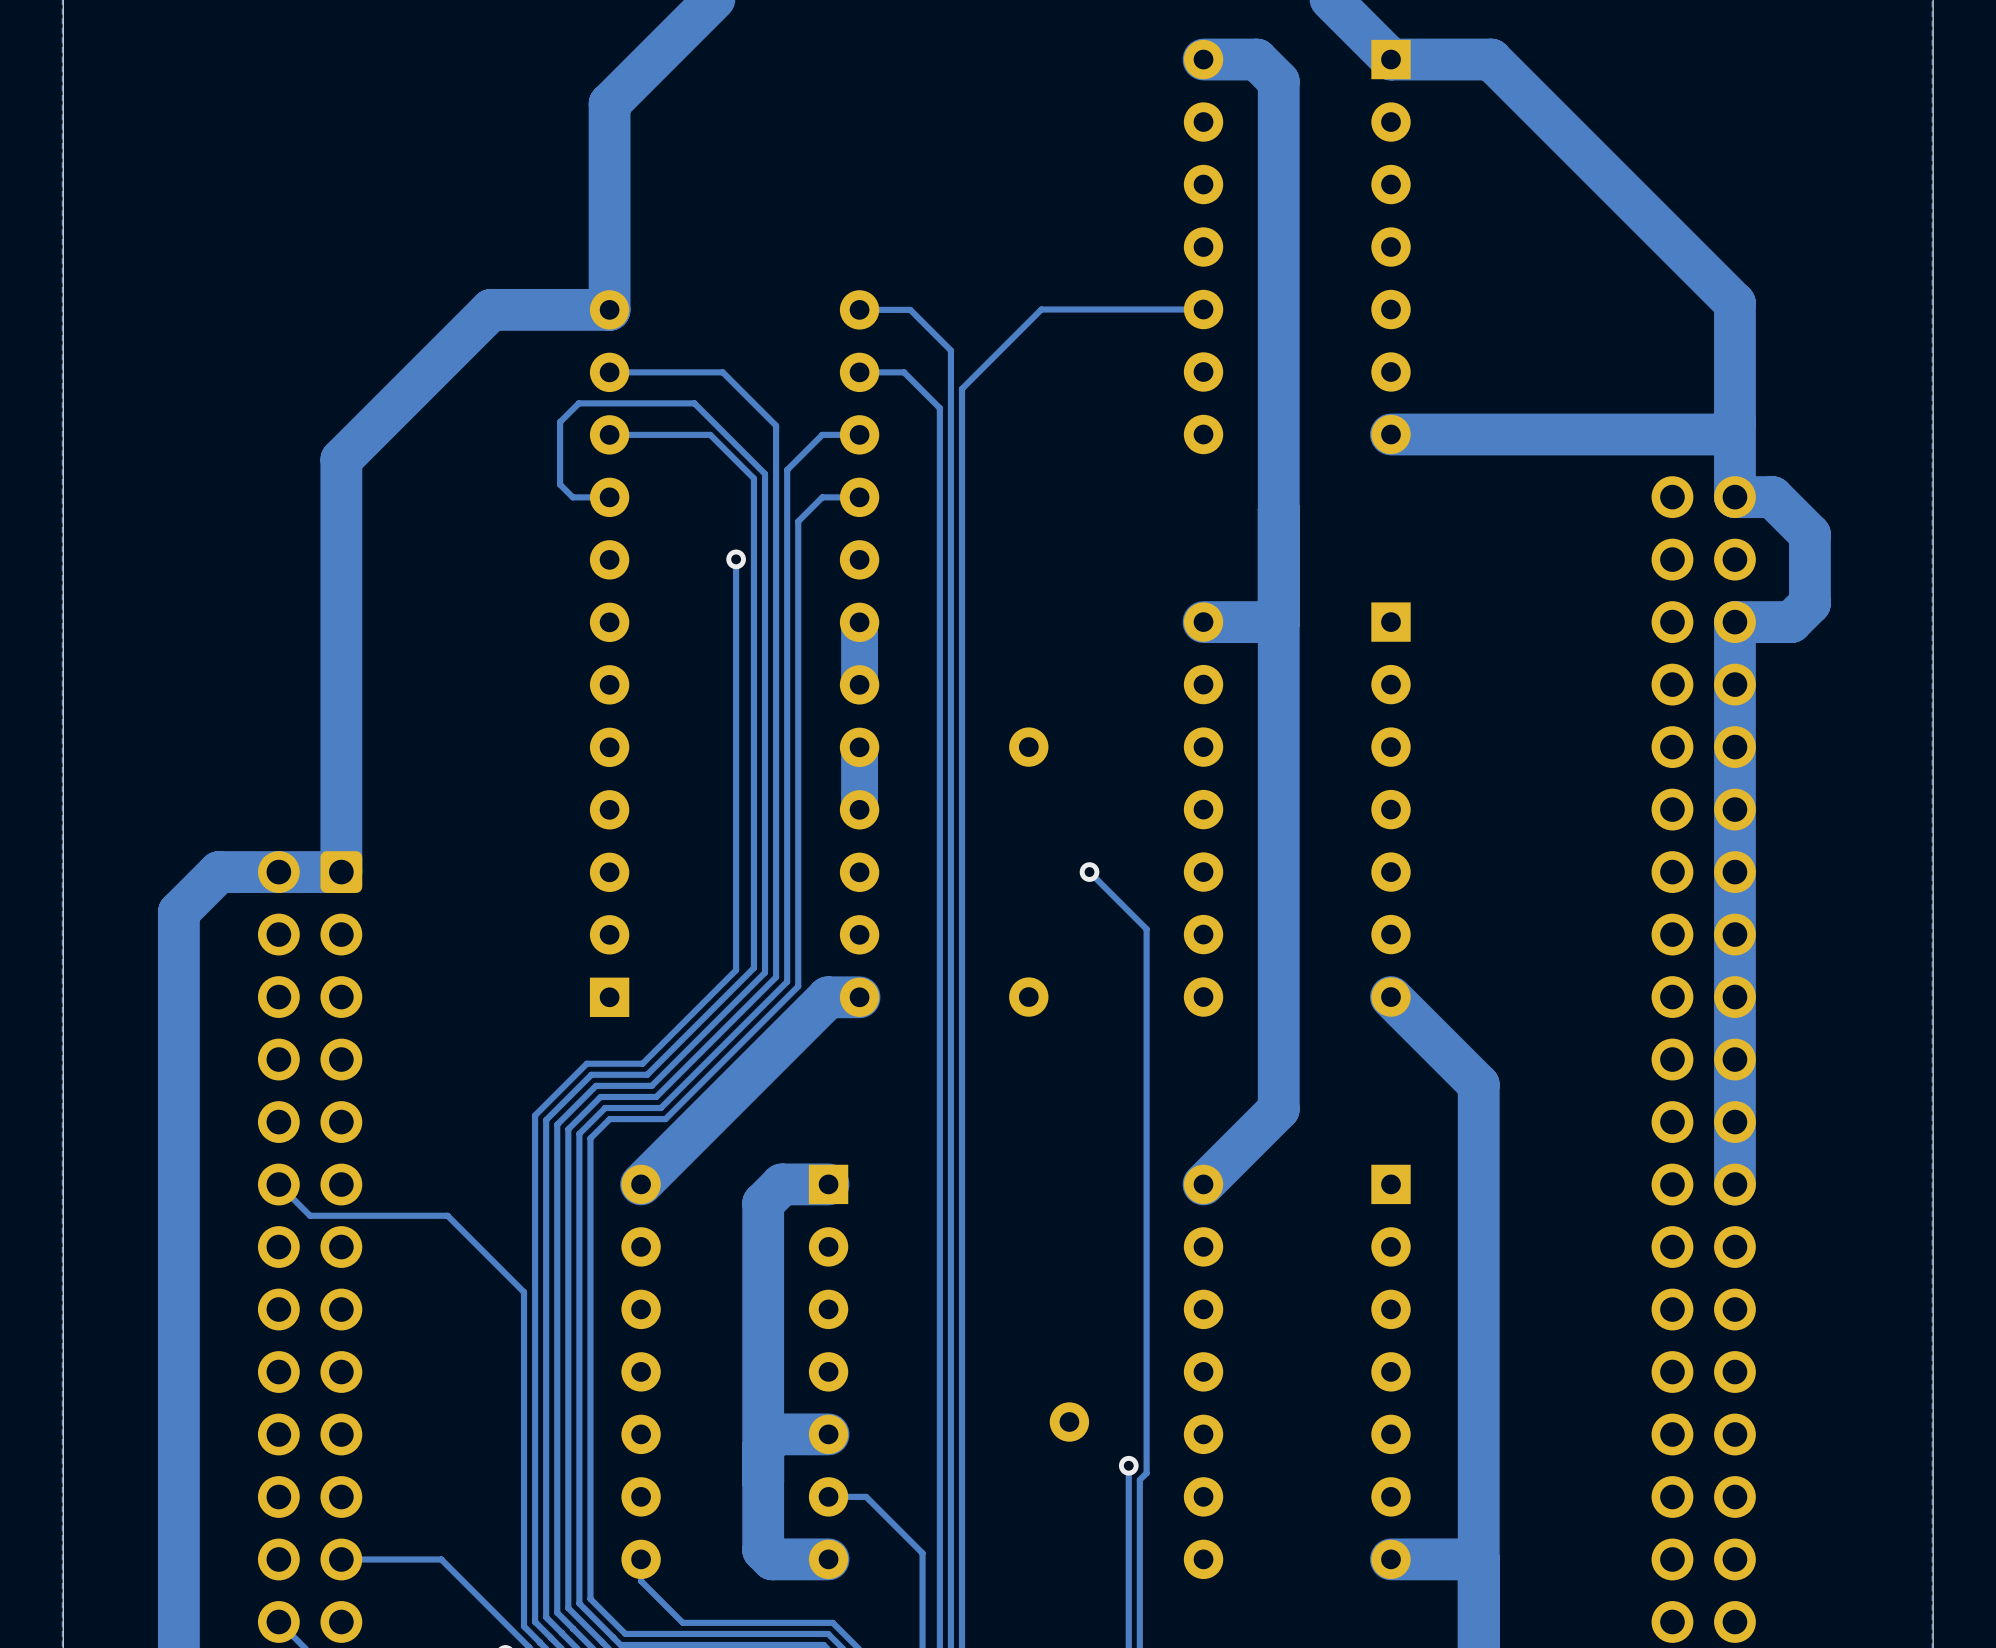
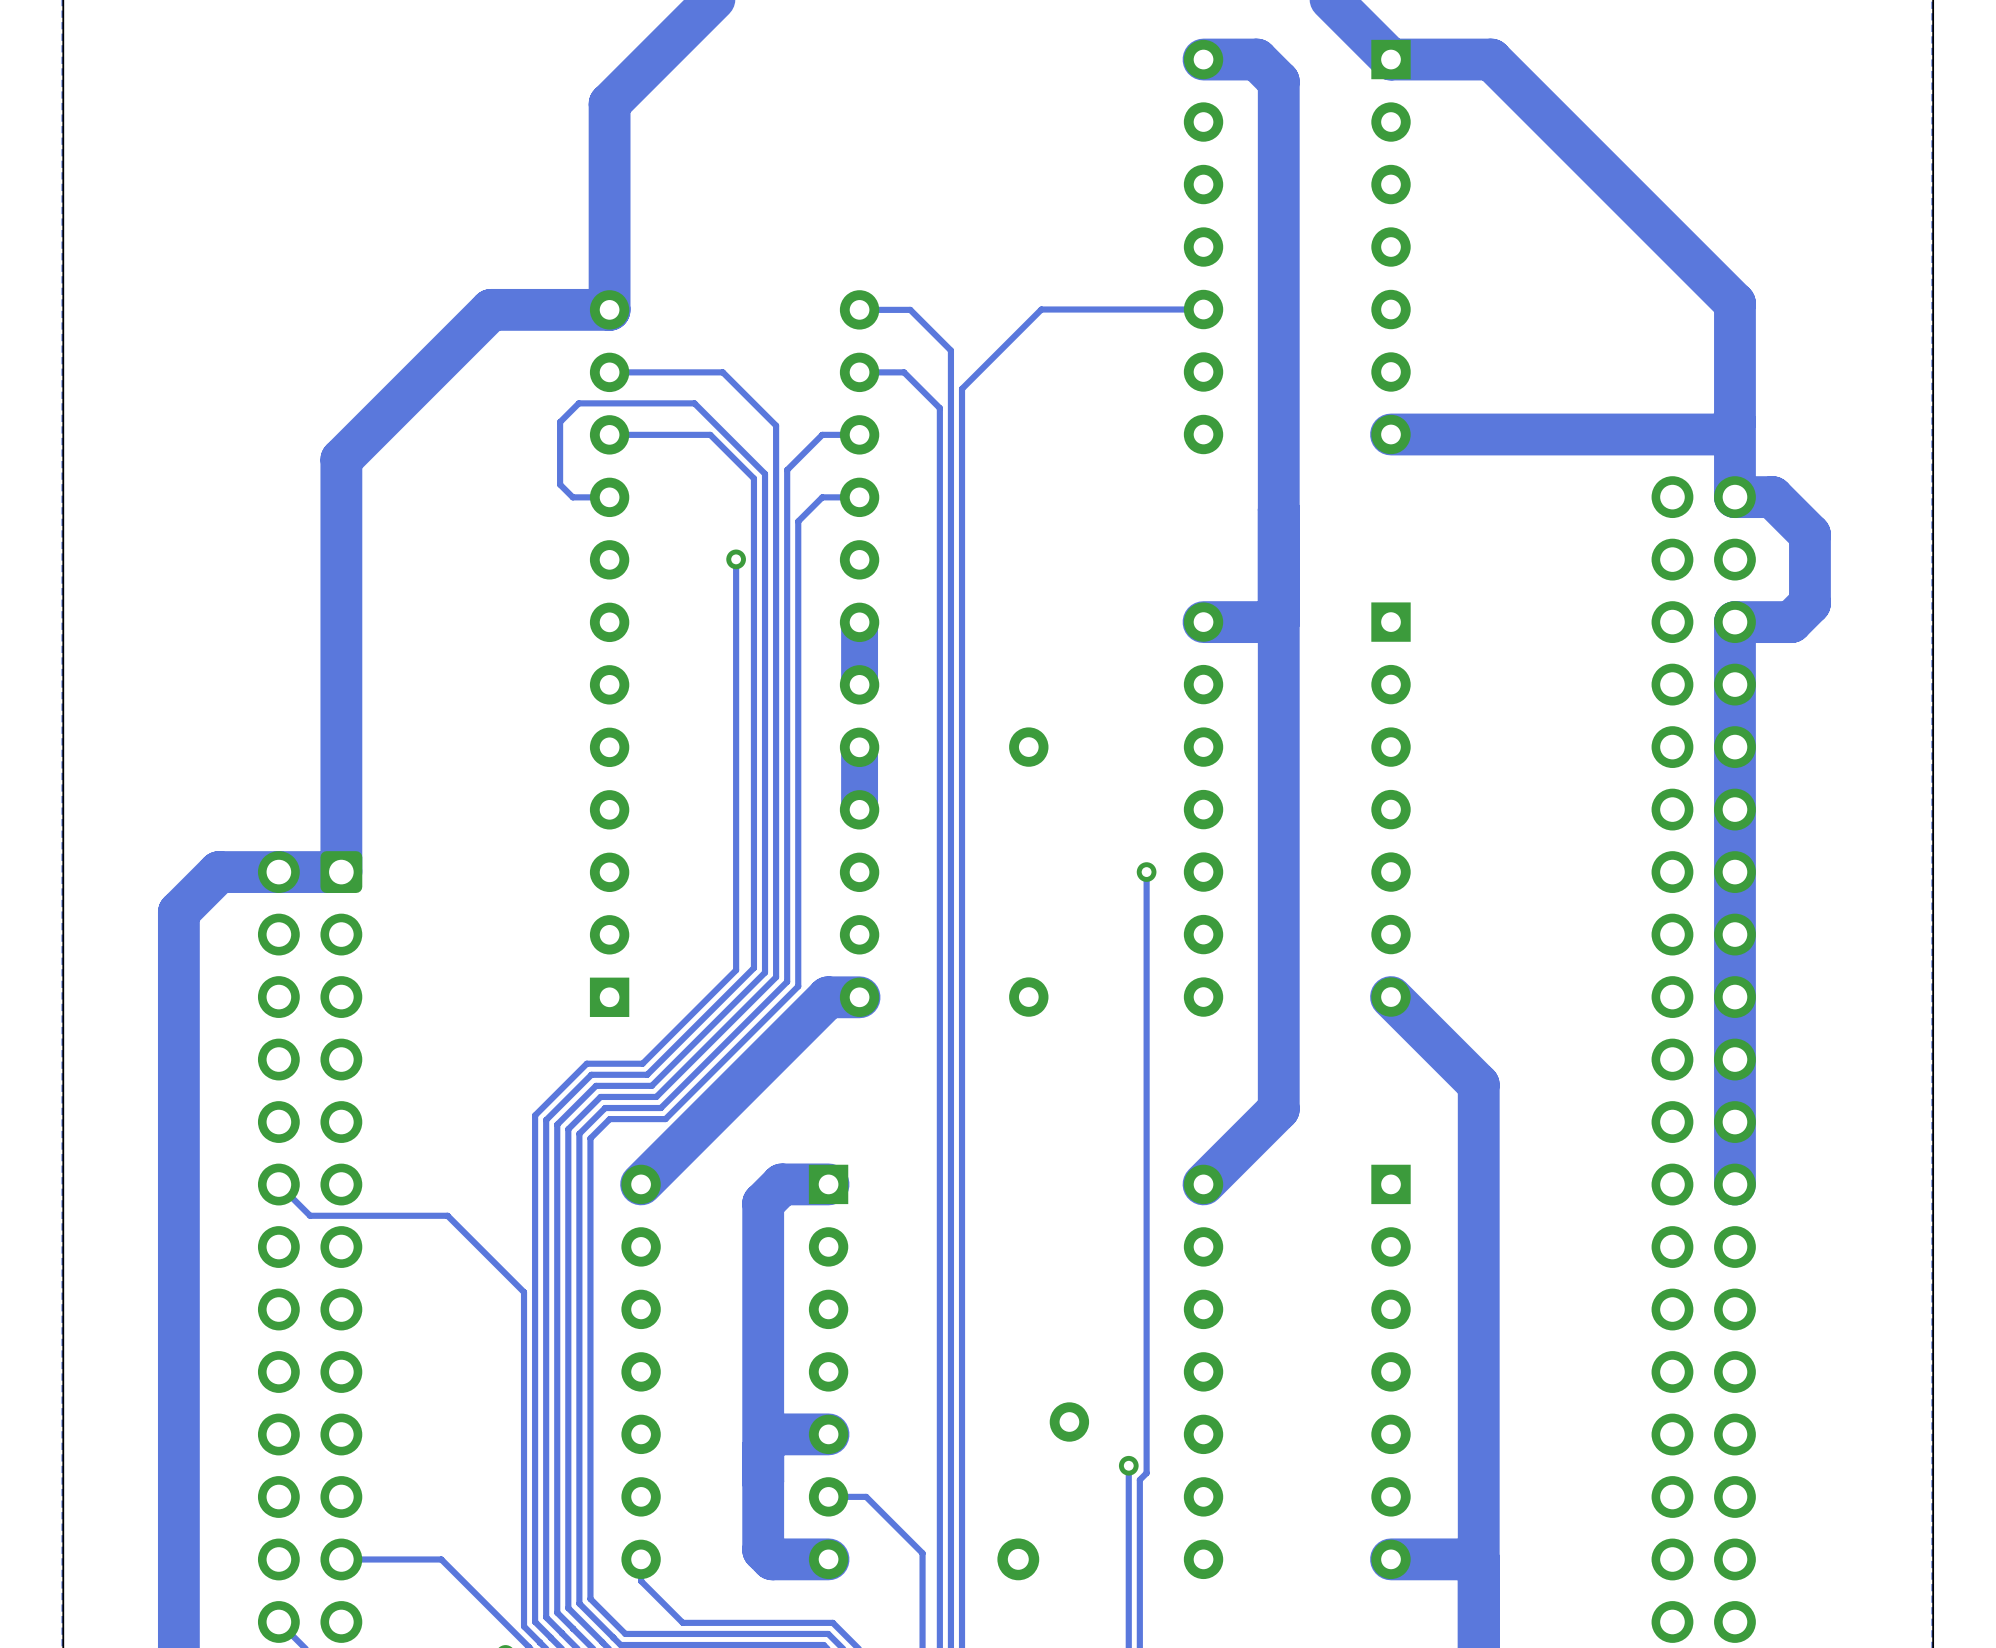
track: (1089, 872) (1146, 929) -> (1146, 872) (1146, 929)
via position: (1089, 872) -> (1146, 872)
via: none -> (1018, 1559)

